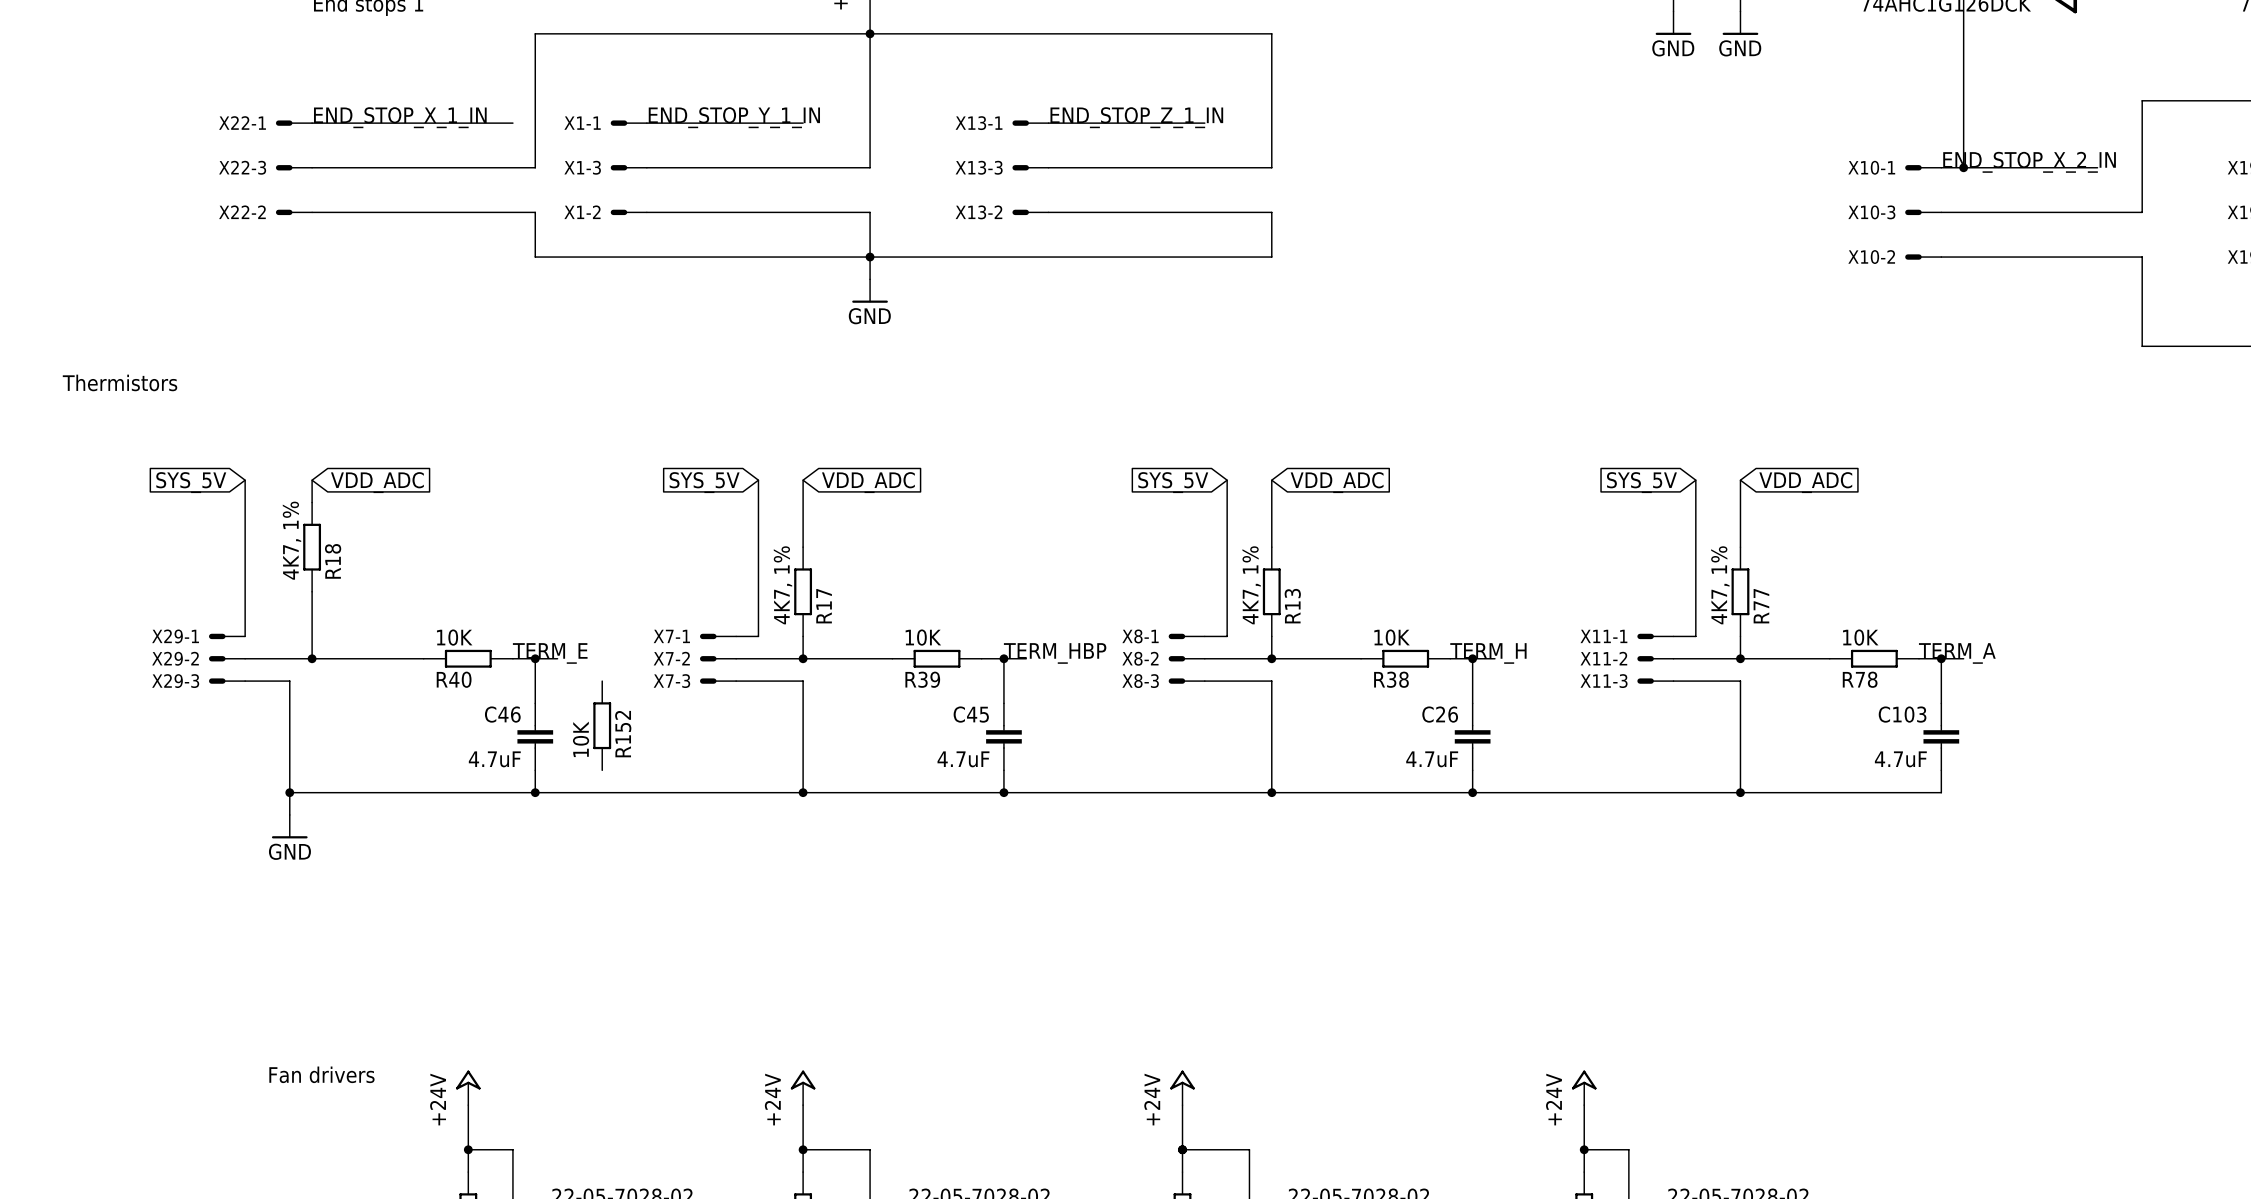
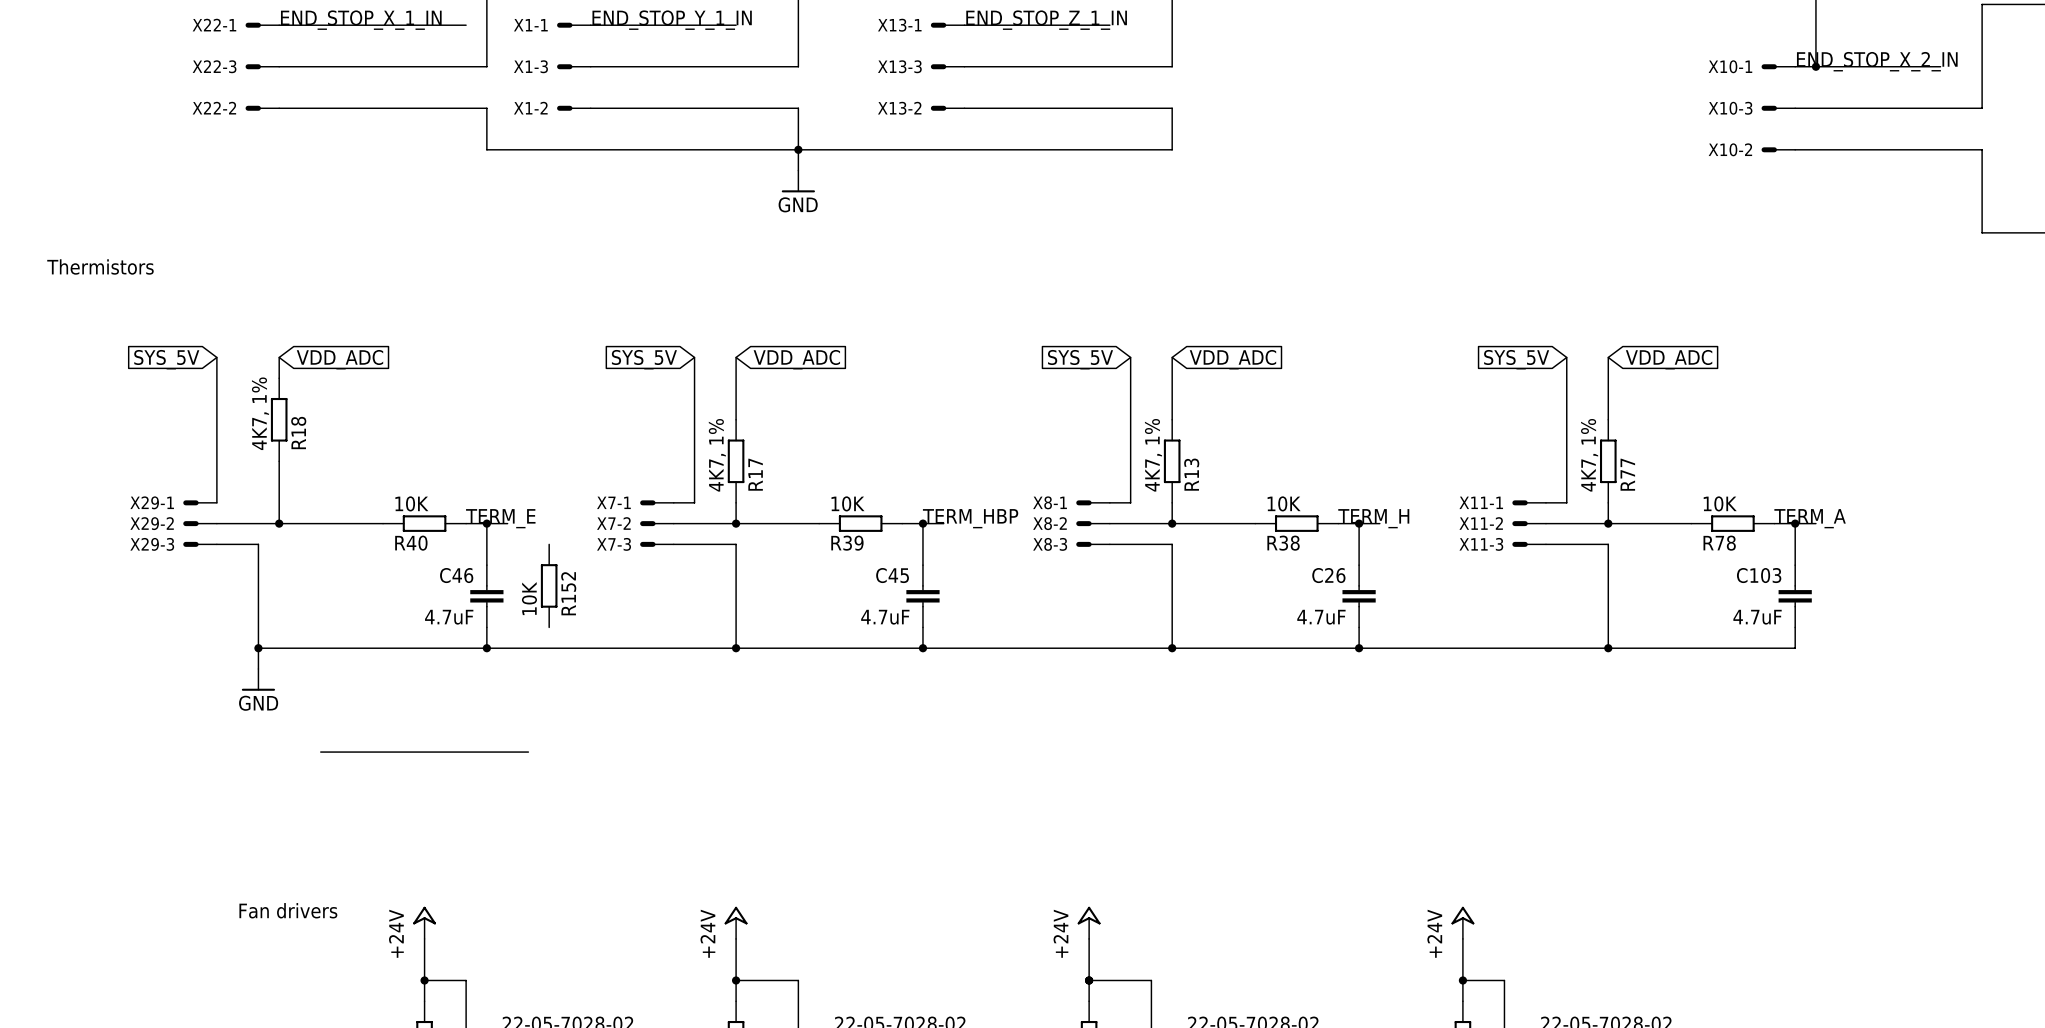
wire: none -> (320, 752) (528, 752)

